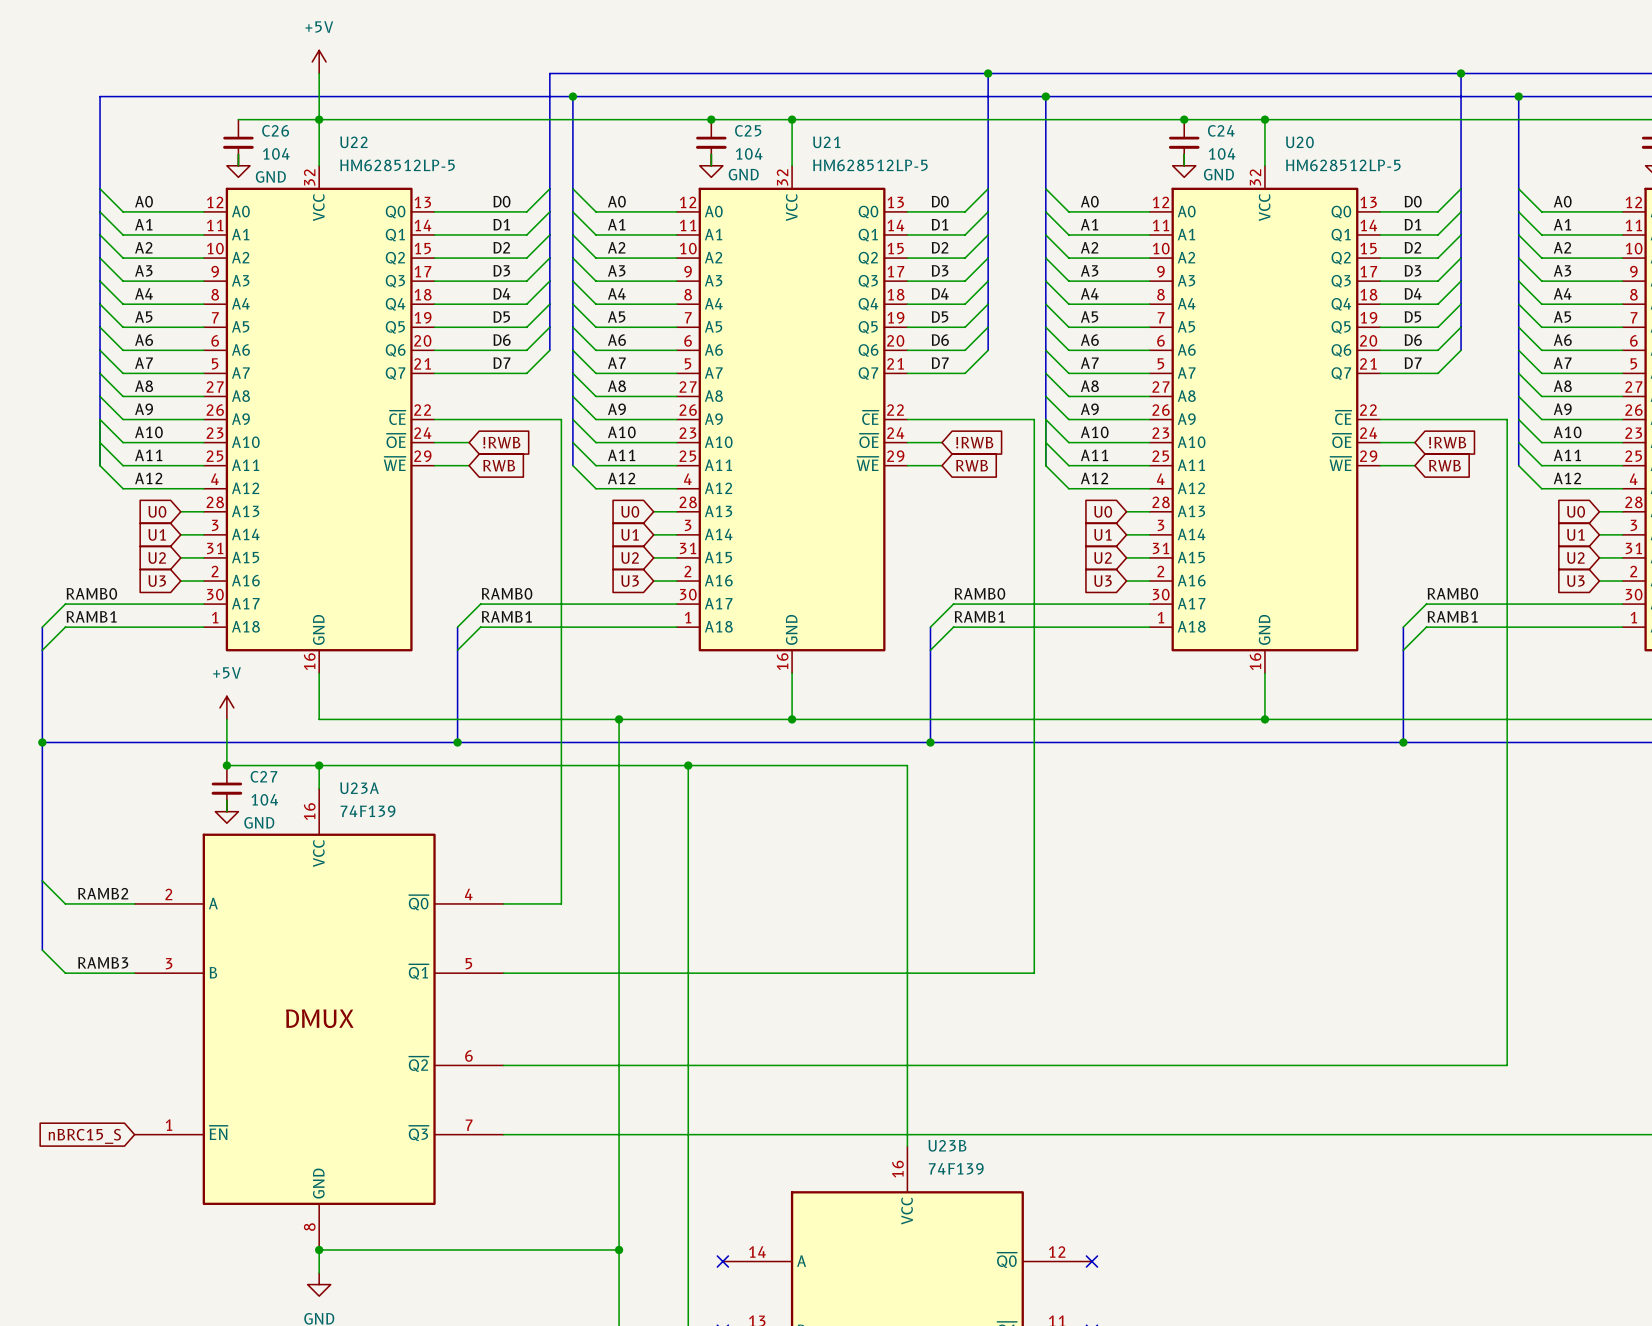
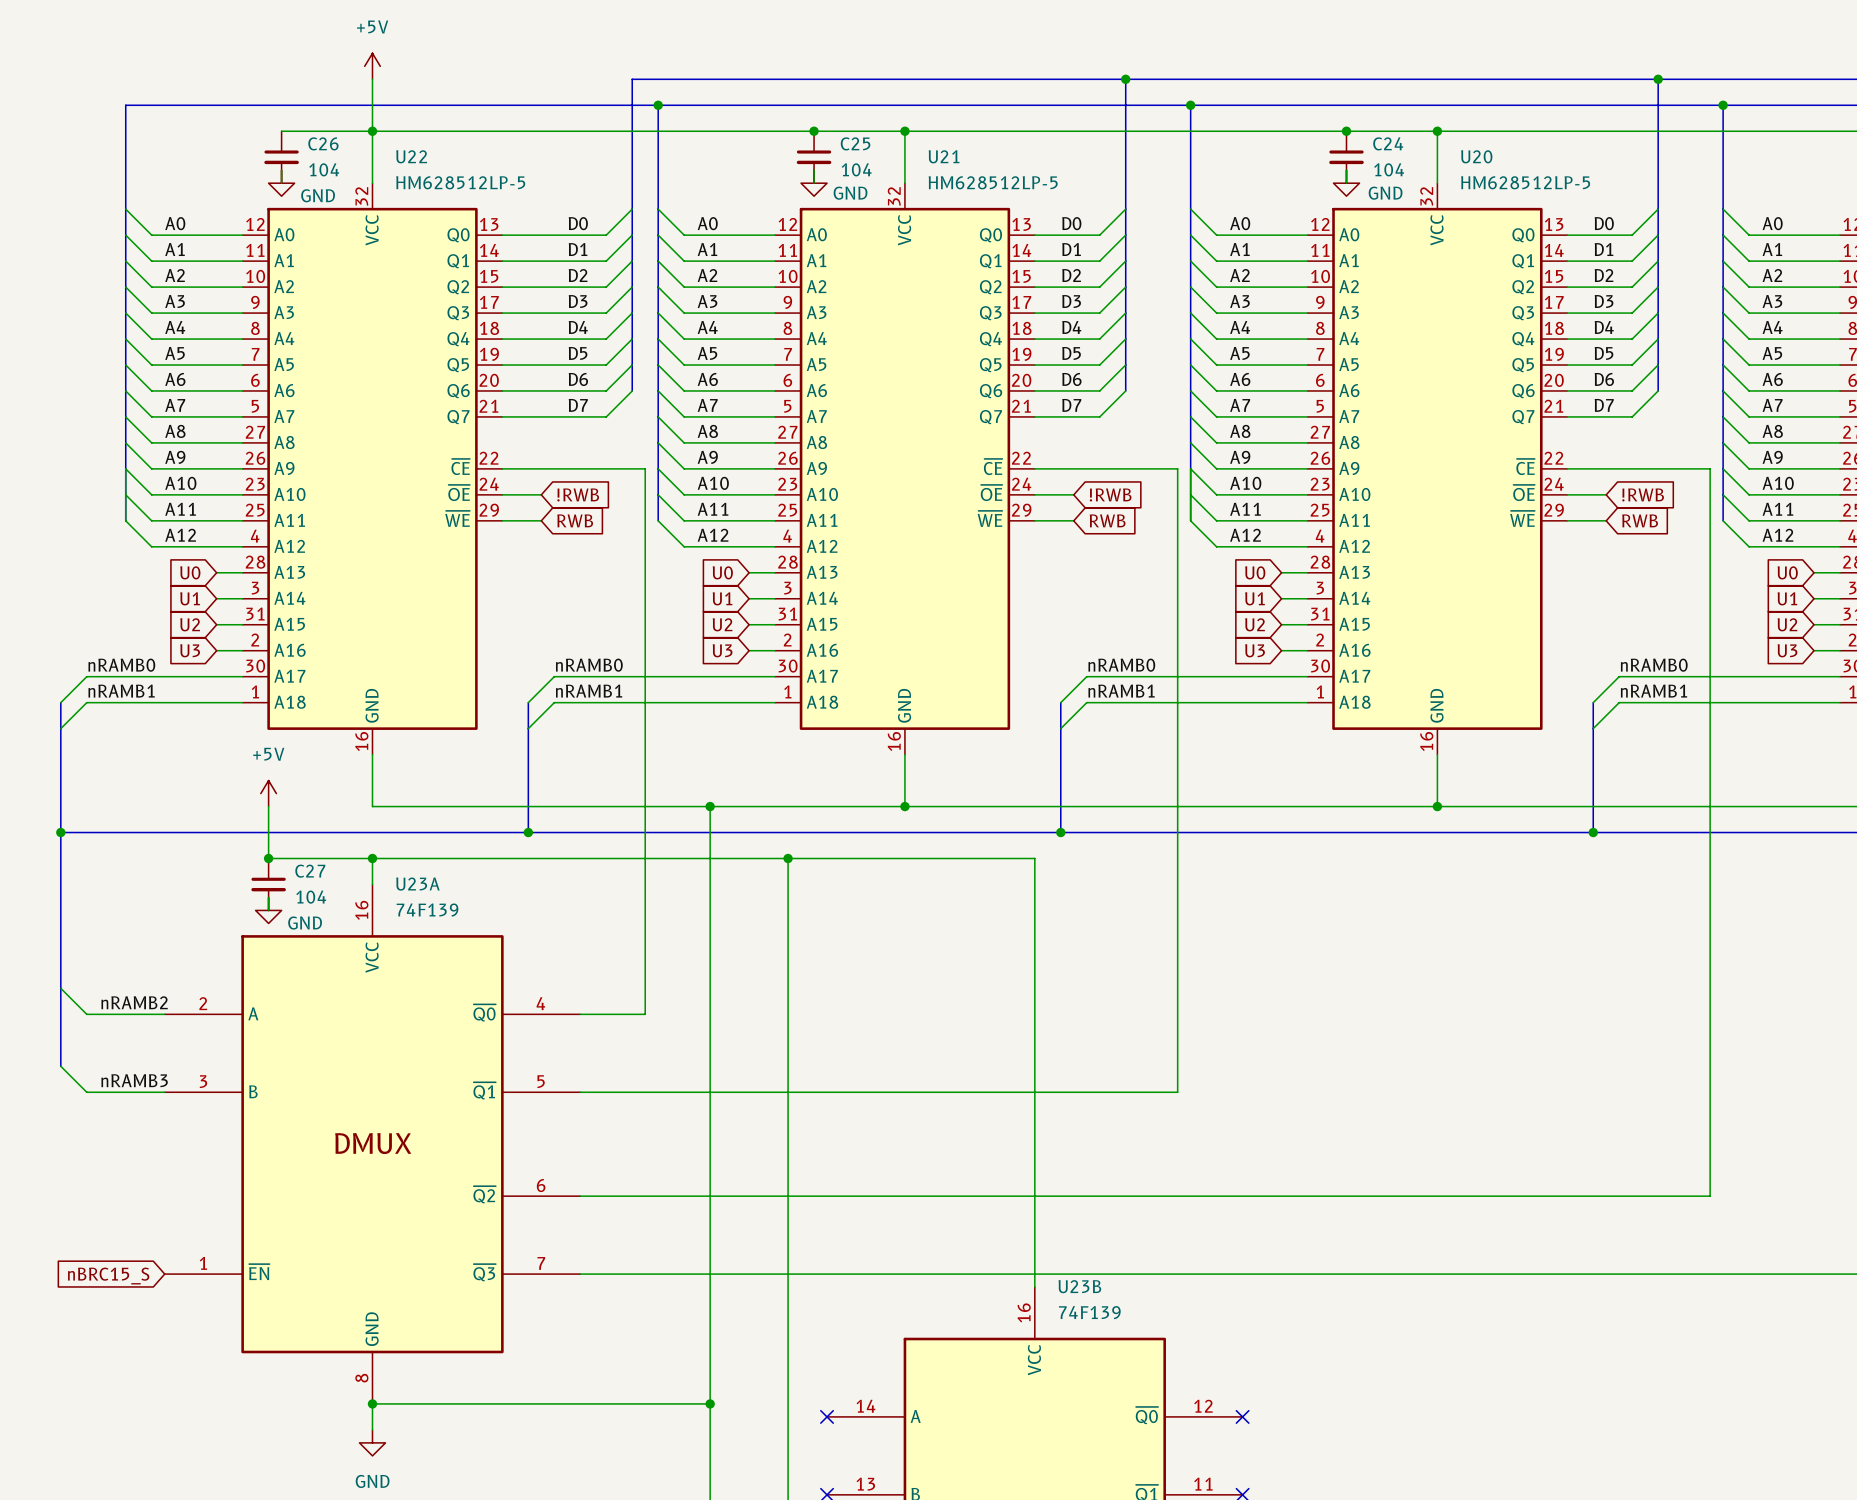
label: RAMB0 (91, 593) -> nRAMB0 (121, 665)
label: RAMB0 (507, 593) -> nRAMB0 (589, 665)
label: RAMB0 (979, 593) -> nRAMB0 (1121, 665)
label: RAMB0 (1452, 593) -> nRAMB0 (1654, 665)
label: RAMB1 (91, 616) -> nRAMB1 (121, 691)
label: RAMB1 (506, 616) -> nRAMB1 (589, 691)
label: RAMB1 (979, 616) -> nRAMB1 (1121, 691)
label: RAMB1 (1452, 616) -> nRAMB1 (1654, 691)
label: RAMB2 (103, 893) -> nRAMB2 (134, 1002)
label: RAMB3 (103, 962) -> nRAMB3 (134, 1080)

